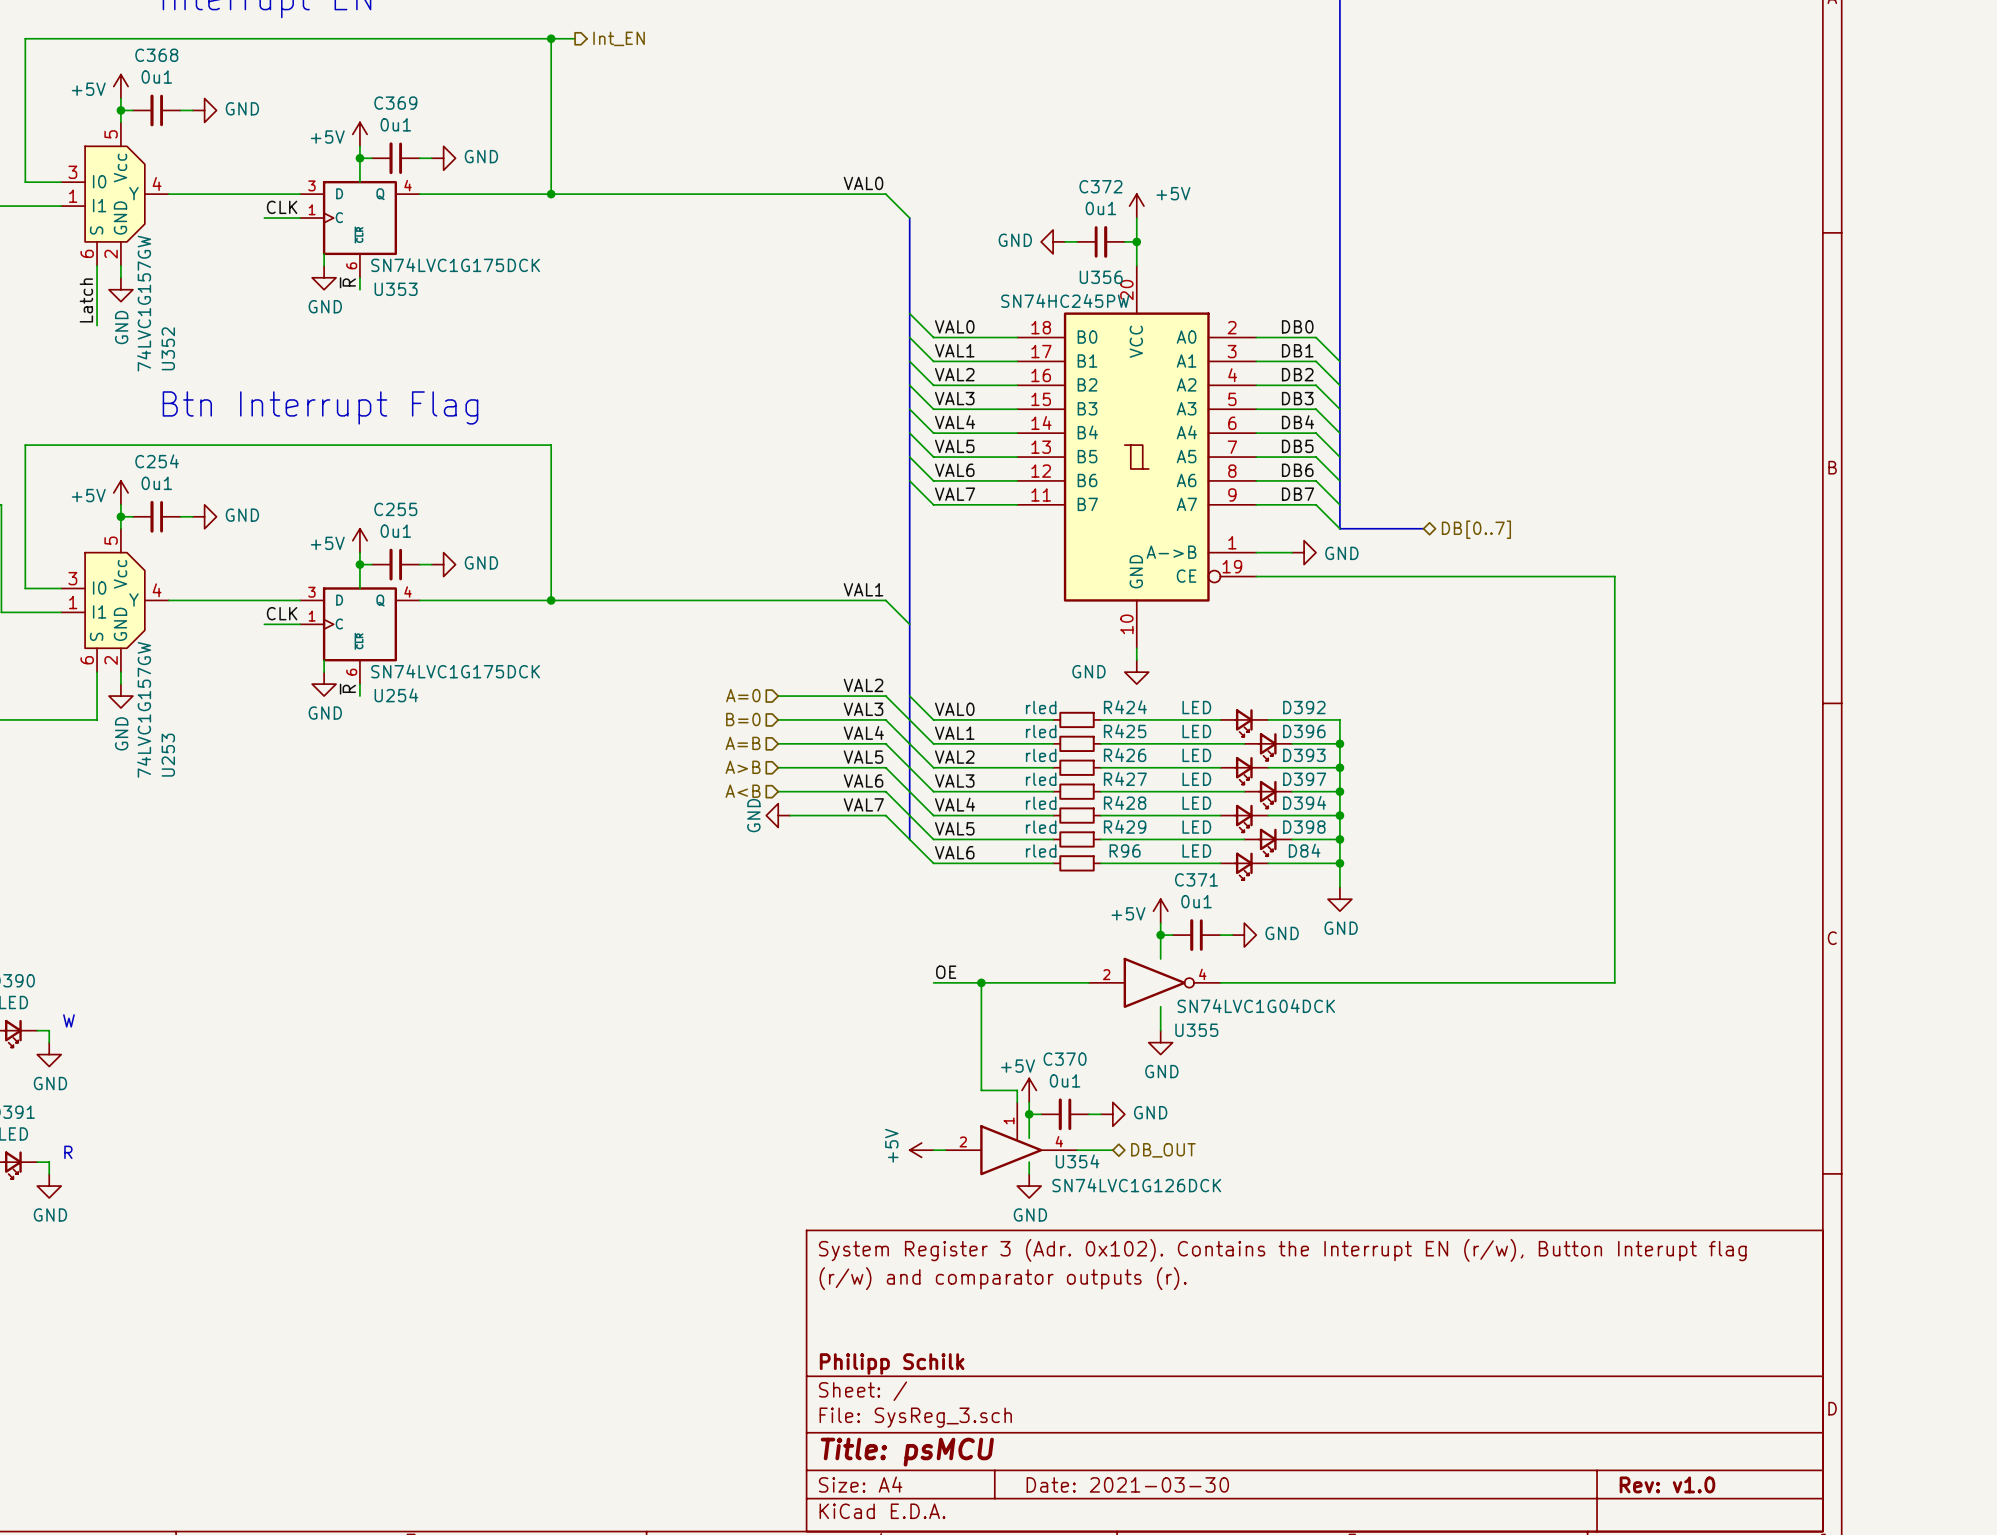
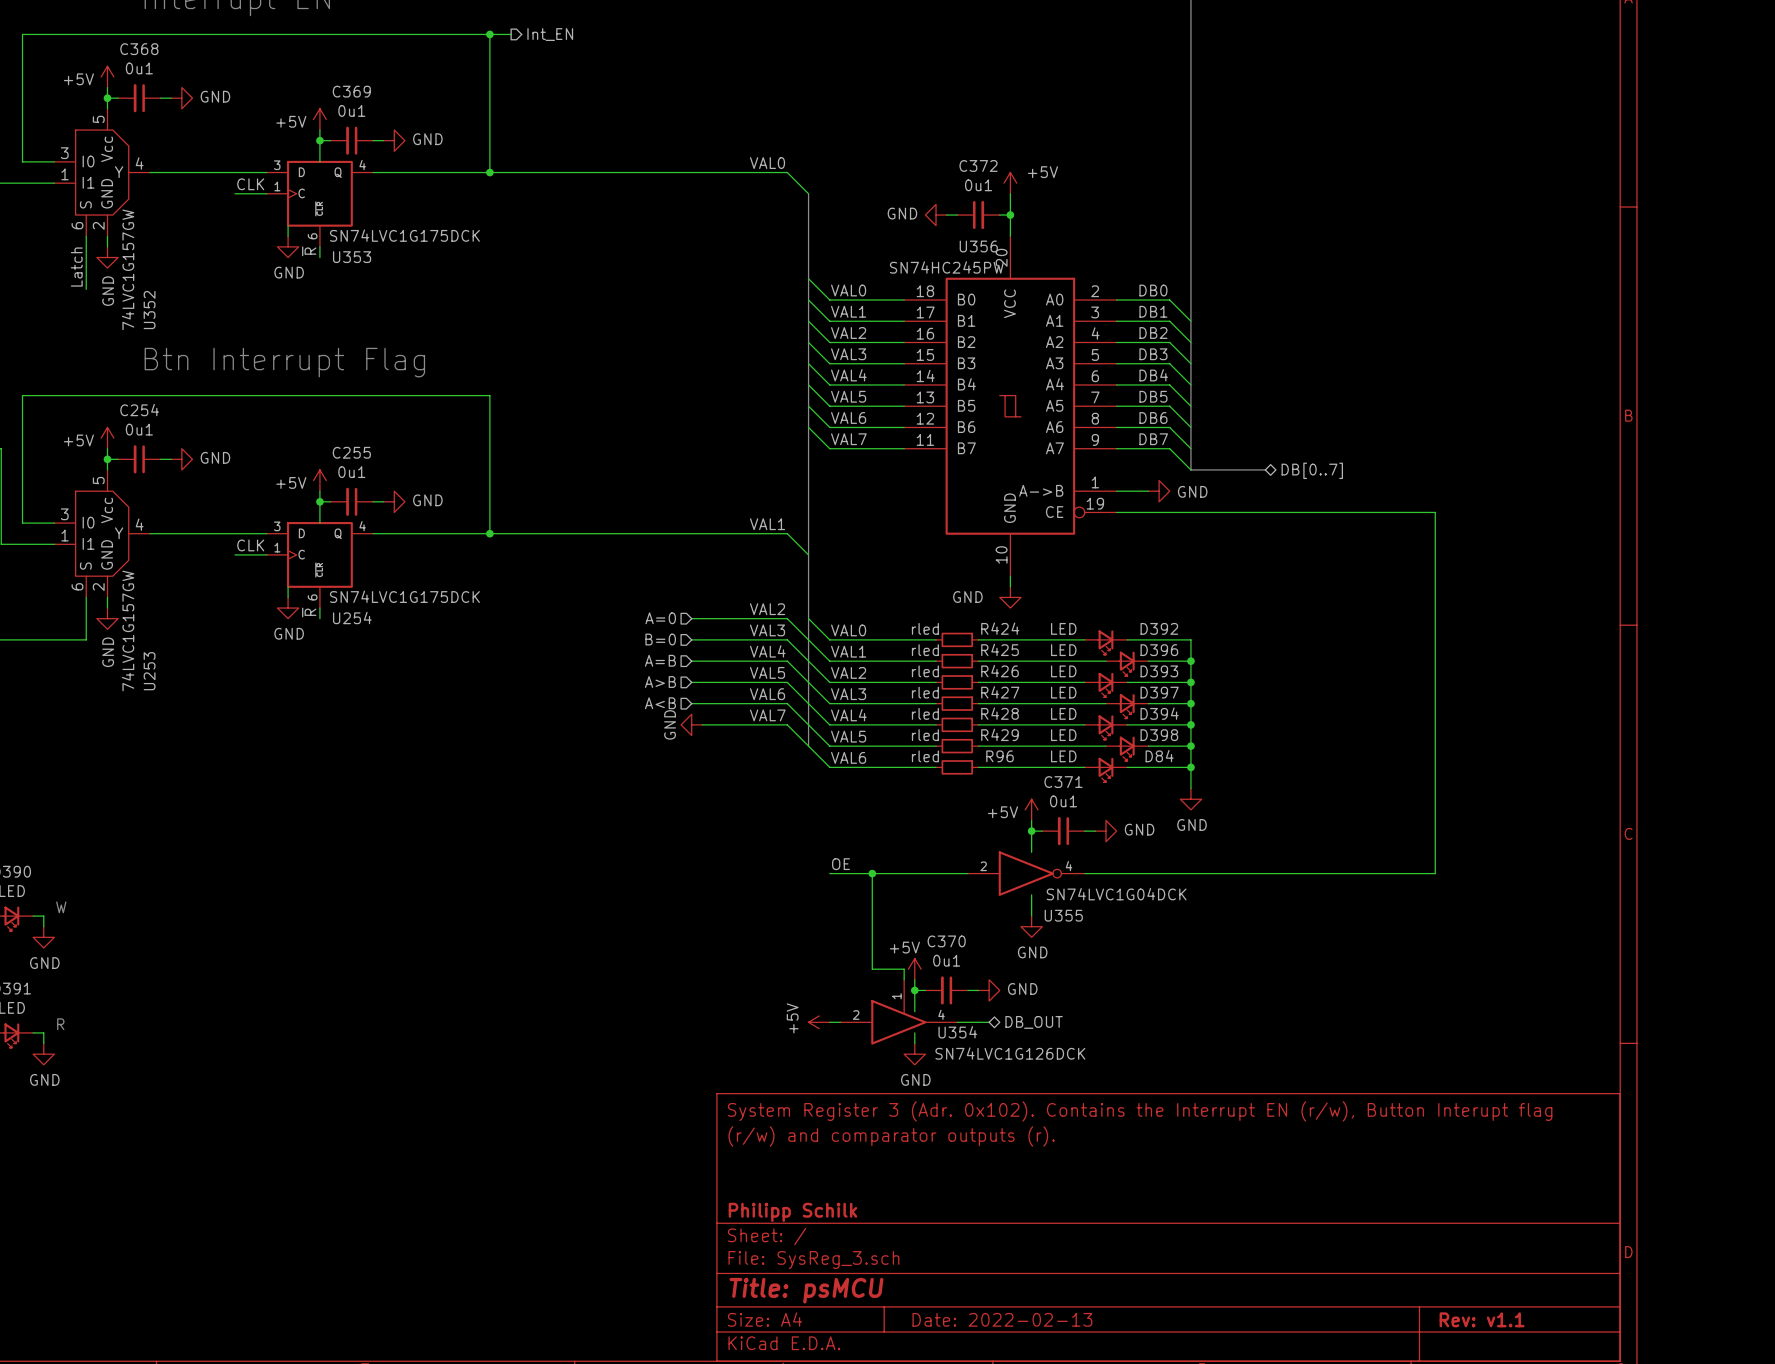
title block: Date: 2021-03-30 (1127, 1484) -> Date: 2022-02-13 (1002, 1319)
title block: Rev: v1.0 (1667, 1484) -> Rev: v1.1 (1482, 1319)

